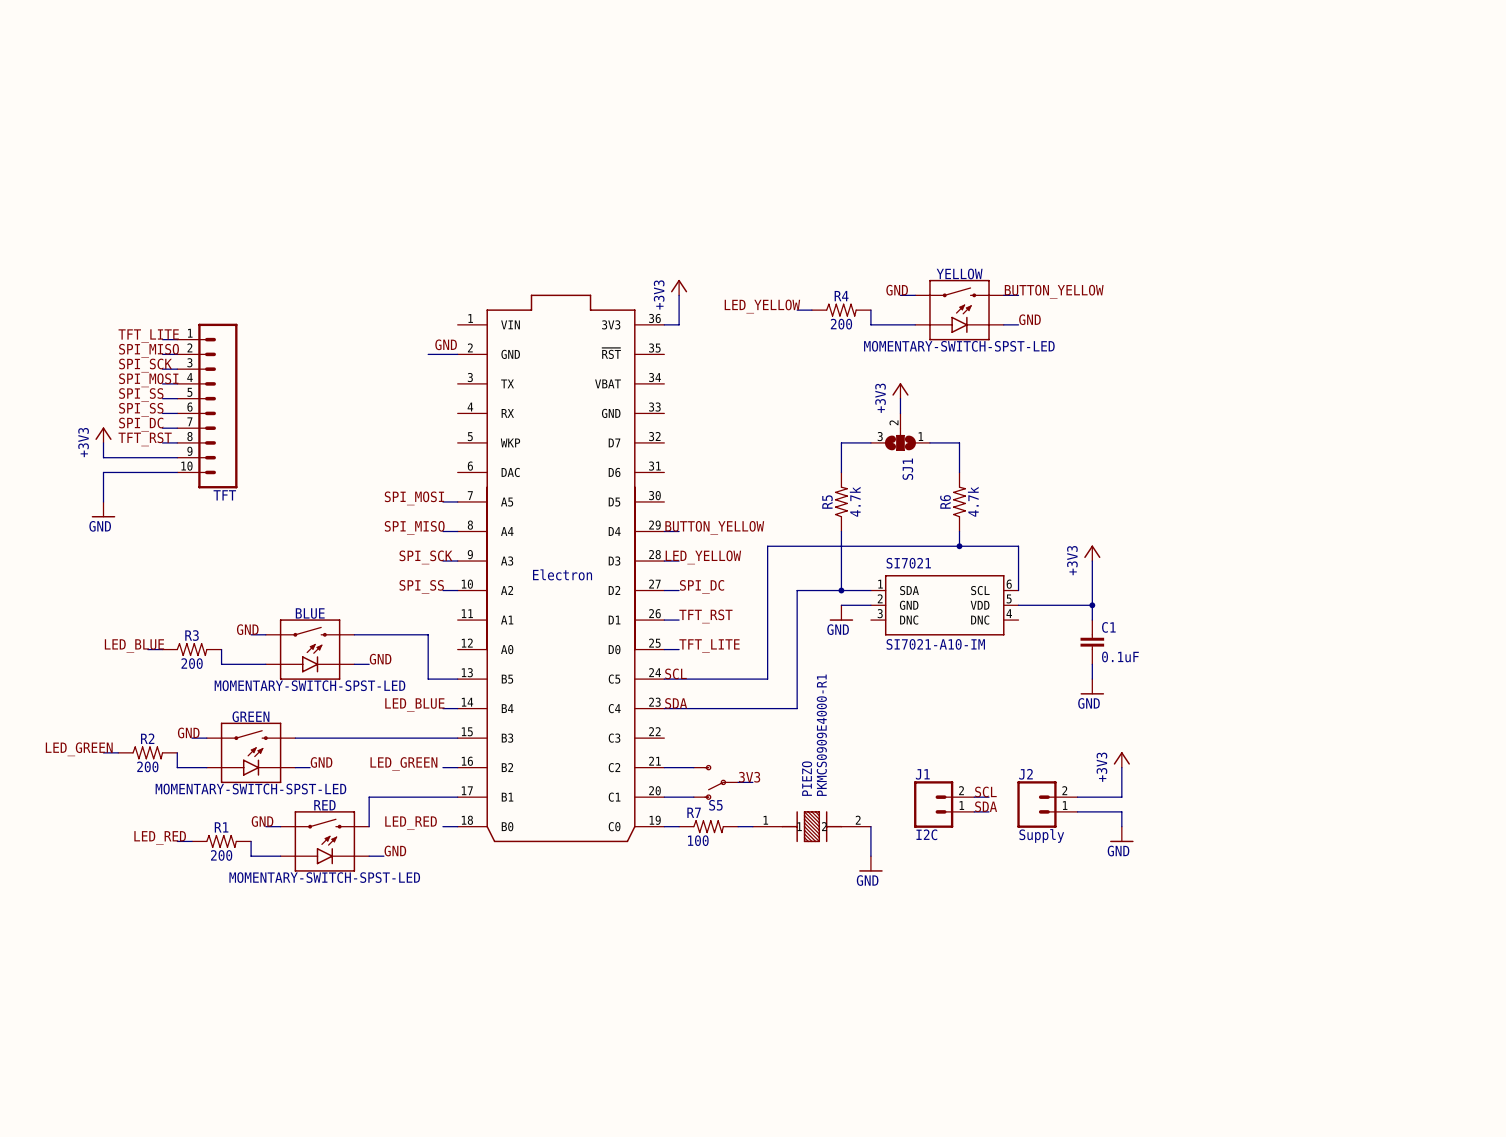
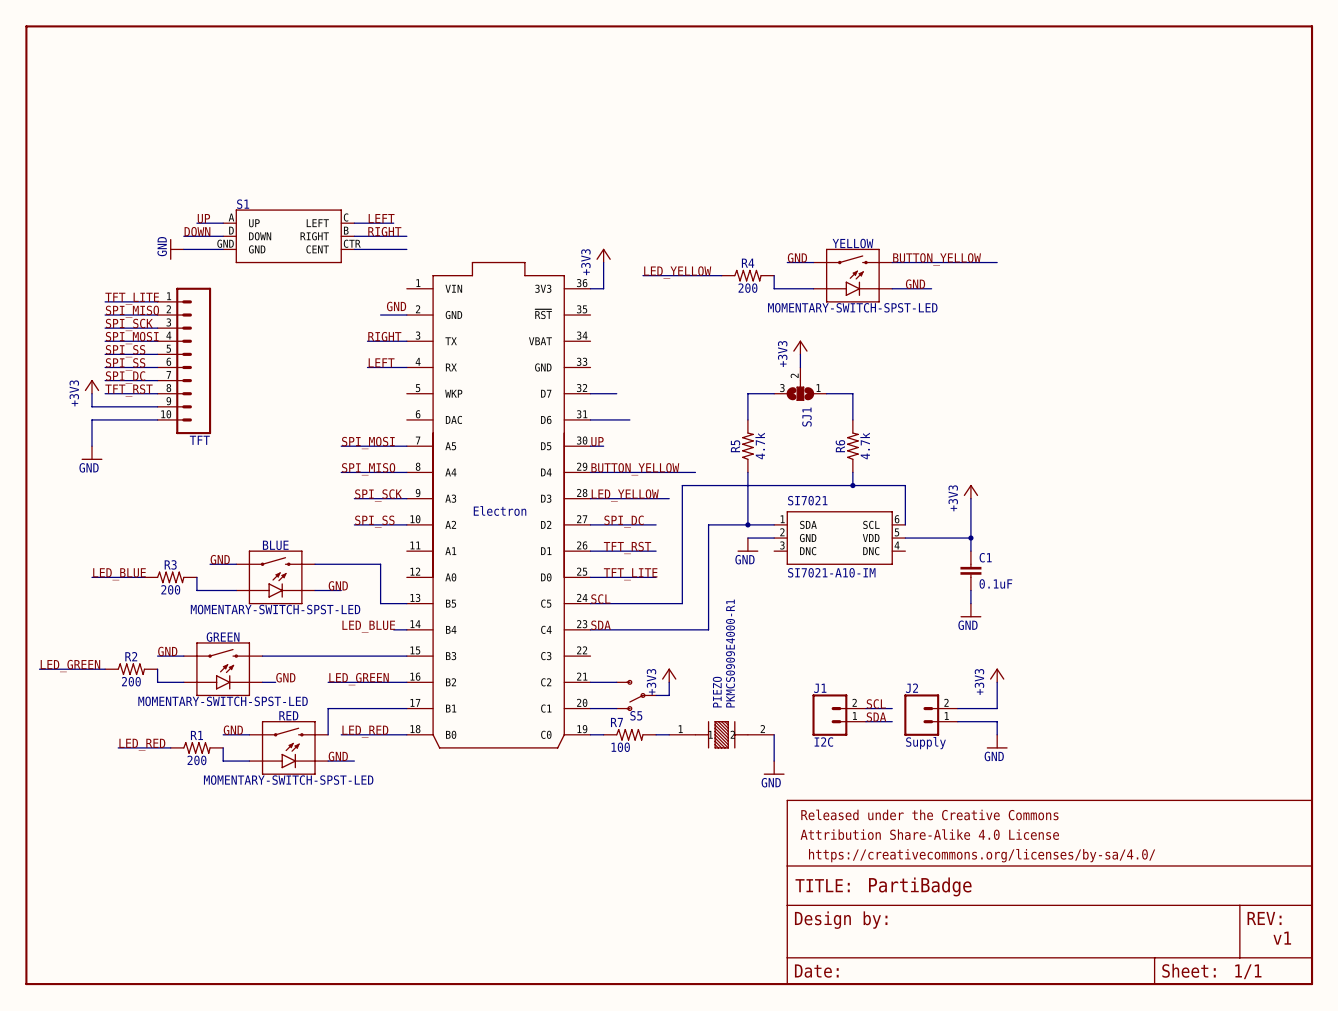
label: none -> LEFT (381, 218)
label: none -> UP (203, 218)
wire: none -> (196, 223) (223, 223)
wire: none -> (354, 223) (393, 223)
label: none -> DOWN (197, 231)
label: none -> RIGHT (384, 231)
wire: none -> (183, 236) (223, 236)
S1: none -> (288, 236)
wire: none -> (354, 236) (406, 236)
power symbol: none -> GND (176, 249)
wire: none -> (183, 249) (223, 249)
wire: none -> (354, 249) (406, 249)
wire: none -> (787, 262) (800, 262)
wire: none -> (905, 262) (997, 262)
wire: none -> (642, 275) (708, 275)
wire: none -> (905, 288) (931, 288)
wire: none -> (105, 301) (144, 301)
wire: none -> (105, 315) (144, 315)
wire: none -> (105, 328) (144, 328)
label: none -> RIGHT (384, 336)
wire: none -> (105, 341) (144, 341)
wire: none -> (367, 341) (406, 341)
wire: none -> (105, 354) (144, 354)
label: none -> LEFT (381, 362)
wire: none -> (105, 367) (144, 367)
wire: none -> (367, 367) (406, 367)
wire: none -> (105, 380) (144, 380)
wire: none -> (105, 393) (144, 393)
wire: none -> (590, 393) (616, 393)
wire: none -> (590, 419) (629, 419)
label: none -> UP (597, 441)
wire: none -> (341, 446) (393, 446)
wire: none -> (590, 446) (603, 446)
wire: none -> (341, 472) (393, 472)
wire: none -> (603, 472) (695, 472)
wire: none -> (354, 498) (393, 498)
wire: none -> (603, 498) (669, 498)
part: none -> (669, 505)
wire: none -> (354, 524) (393, 524)
wire: none -> (603, 524) (656, 524)
wire: none -> (603, 551) (656, 551)
wire: none -> (210, 564) (223, 564)
wire: none -> (91, 577) (131, 577)
wire: none -> (603, 577) (656, 577)
wire: none -> (328, 590) (341, 590)
wire: none -> (157, 656) (170, 656)
wire: none -> (39, 669) (91, 669)
power symbol: none -> +3V3 (669, 675)
wire: none -> (328, 682) (393, 682)
wire: none -> (669, 682) (669, 695)
label: 3V3 (749, 777) -> none
wire: none -> (879, 708) (892, 708)
wire: none -> (879, 721) (892, 721)
wire: none -> (223, 734) (236, 734)
wire: none -> (341, 734) (393, 734)
wire: none -> (118, 747) (157, 747)
label position: GND (395, 851) -> GND (338, 756)
wire: none -> (341, 761) (354, 761)
part: none -> (1049, 892)
text: none -> v1 (1282, 938)

